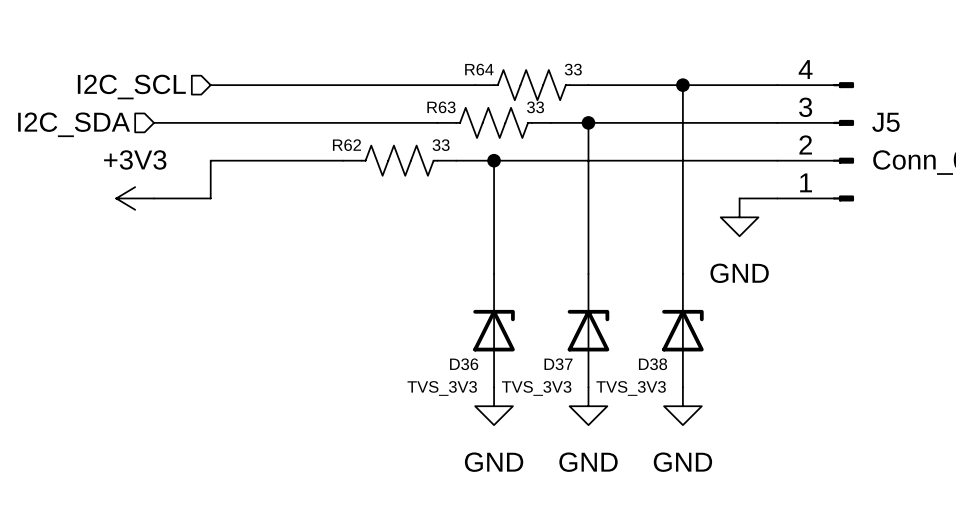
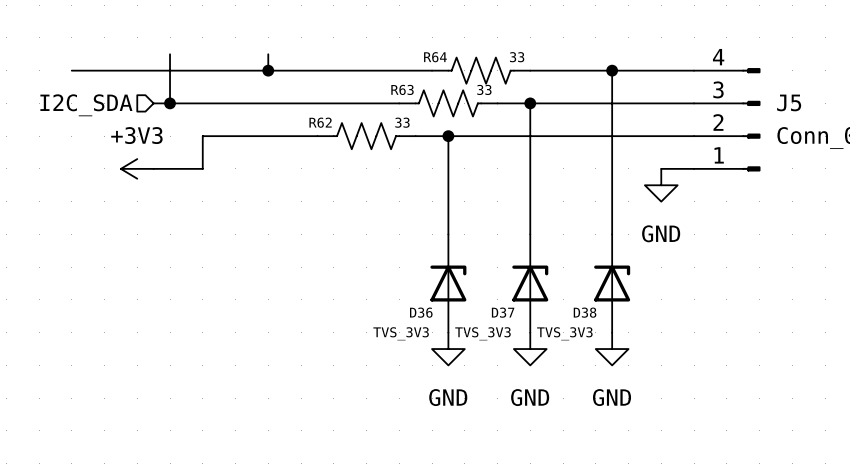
wire: none -> (170, 54) (170, 103)
wire: none -> (268, 54) (268, 70)
wire: none -> (71, 70) (202, 70)
junction: none -> (268, 70)
hierarchical label: I2C_SCL (131, 87) -> none
junction: none -> (170, 103)

